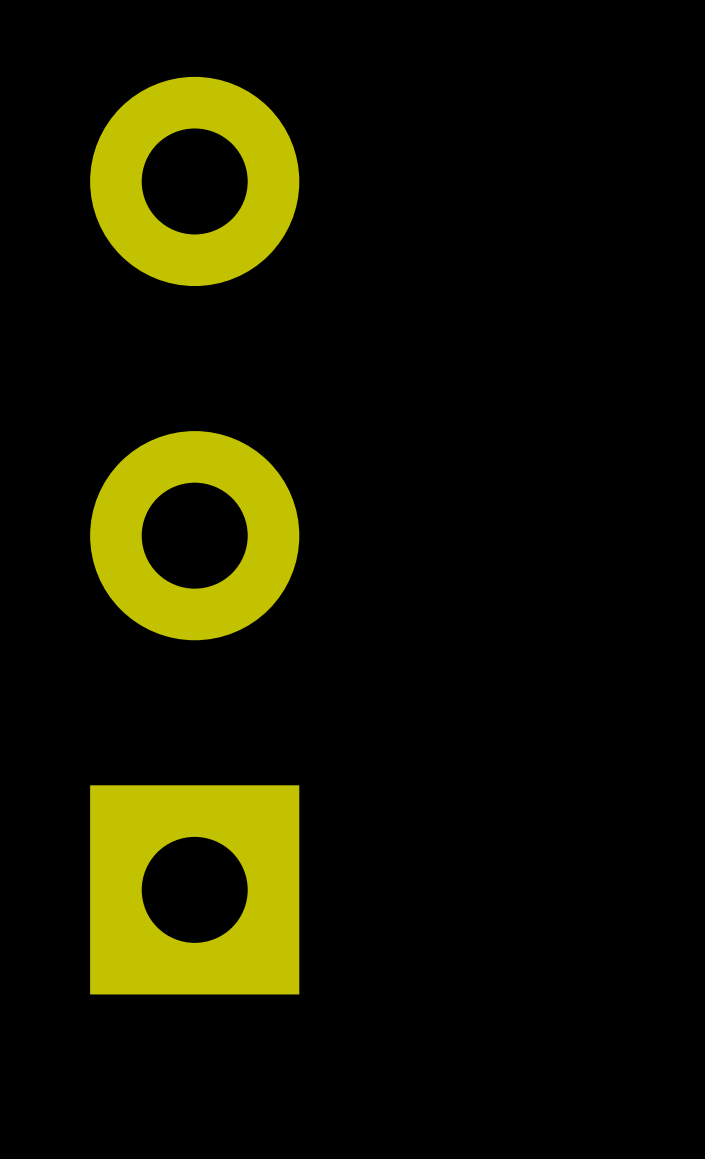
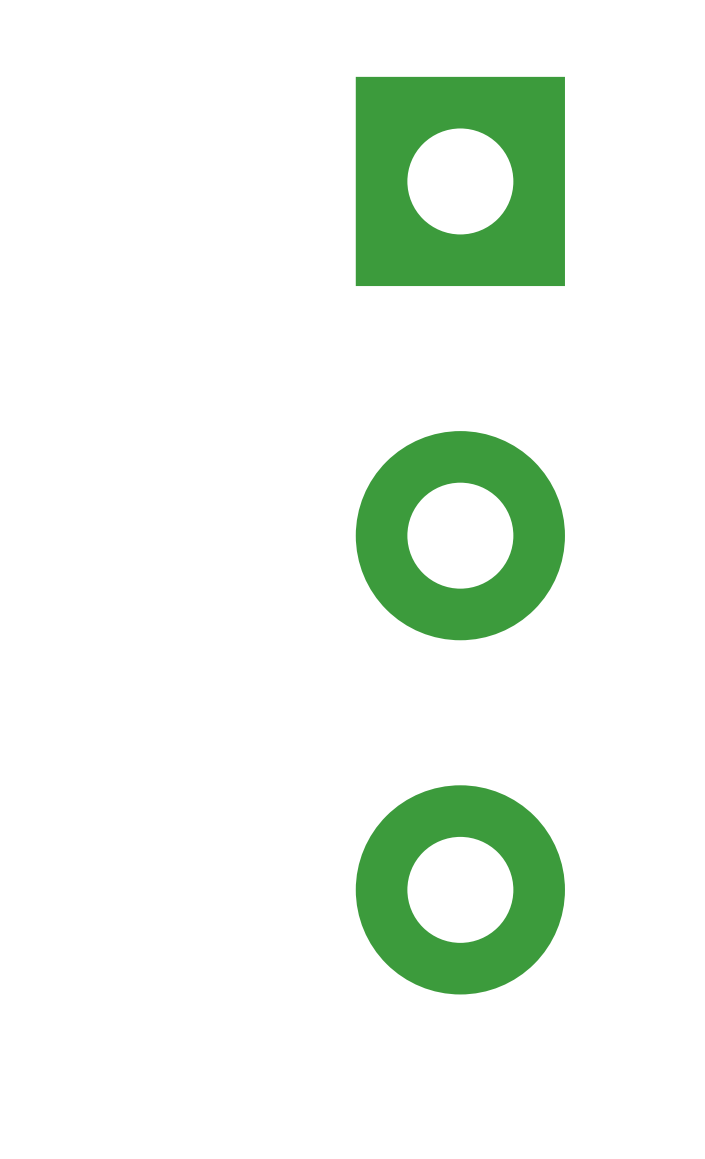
part rotation: 0° (194, 535) -> 180° (460, 535)

